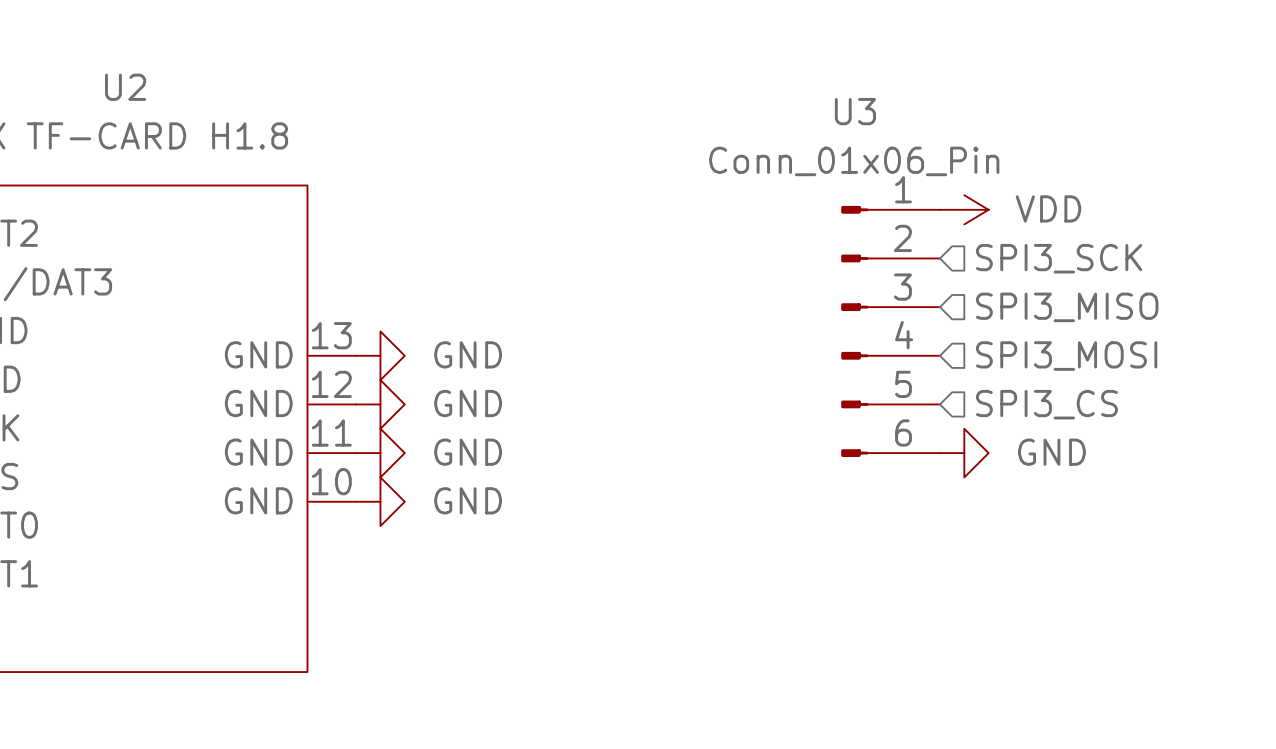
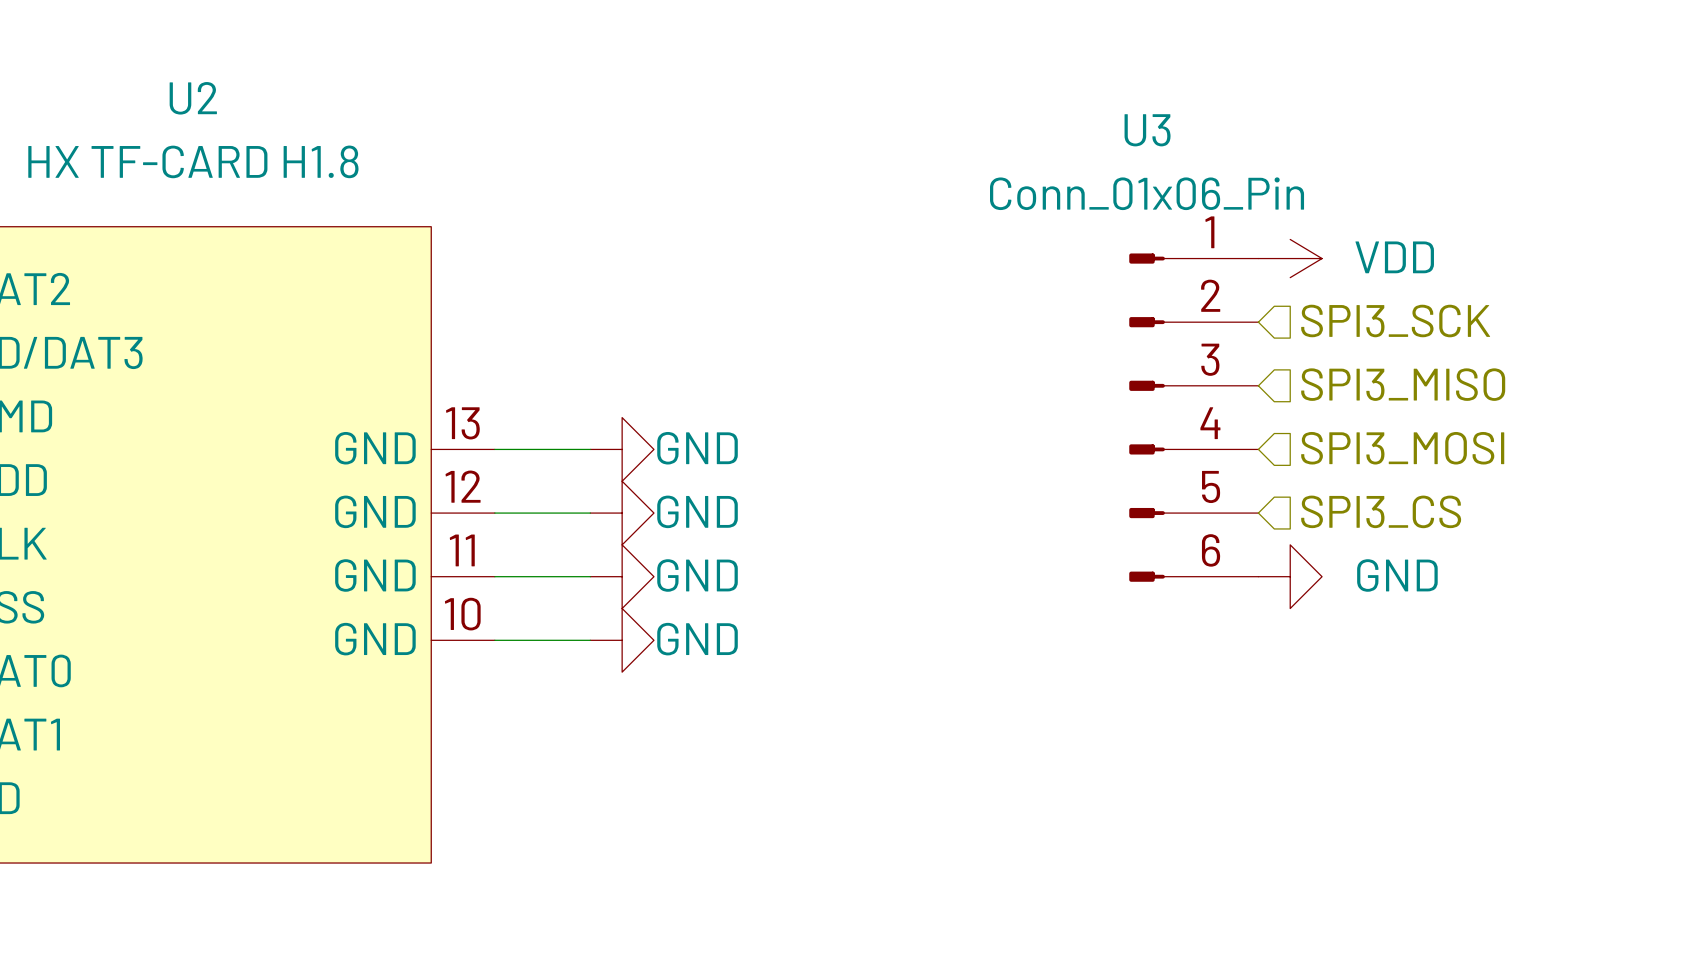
wire: none -> (494, 449) (590, 449)
power symbol: GND (380, 355) -> none
power symbol: none -> GND (622, 449)
wire: none -> (494, 513) (590, 513)
power symbol: GND (380, 404) -> none
power symbol: none -> GND (622, 513)
wire: none -> (494, 576) (590, 576)
power symbol: GND (380, 453) -> none
power symbol: none -> GND (622, 576)
wire: none -> (494, 640) (590, 640)
power symbol: GND (380, 501) -> none
power symbol: none -> GND (622, 640)

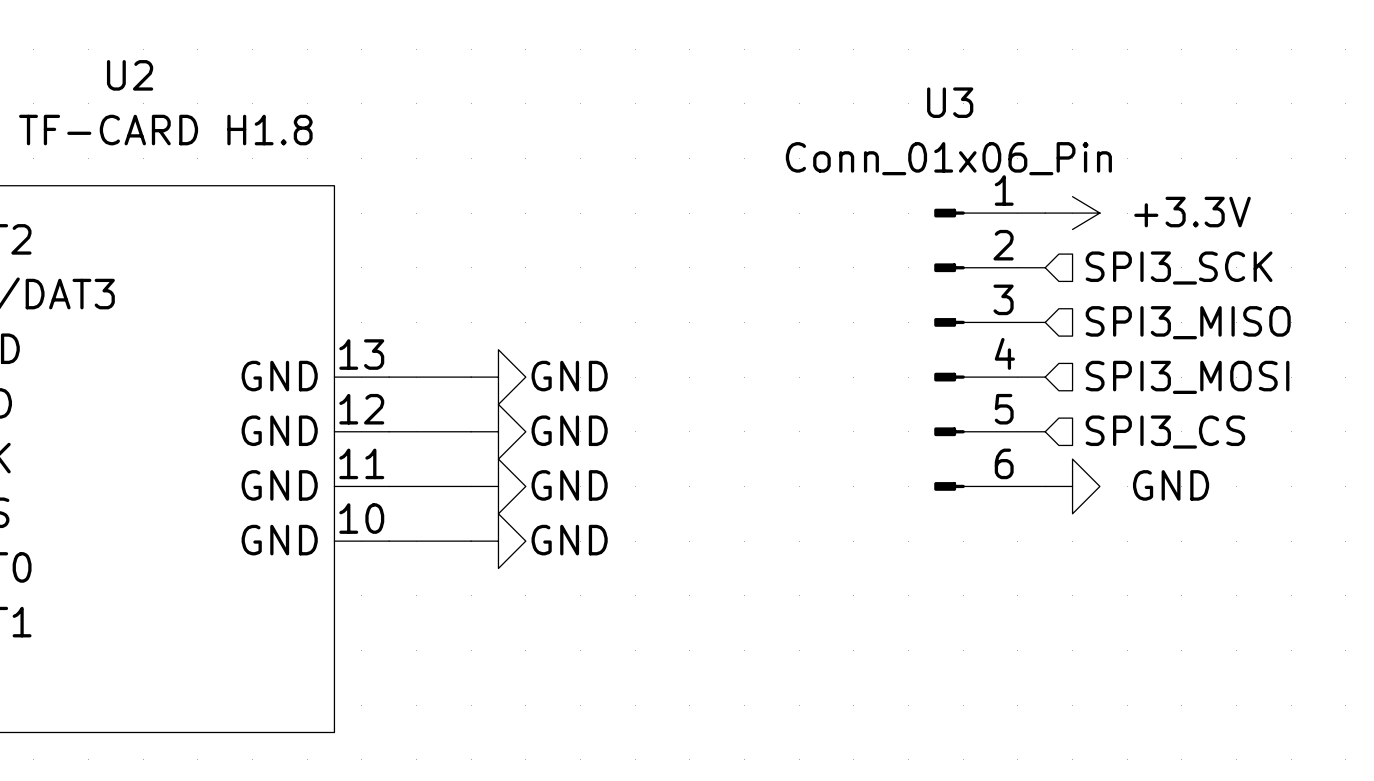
power symbol: VDD (1290, 258) -> +3.3V (1072, 213)

